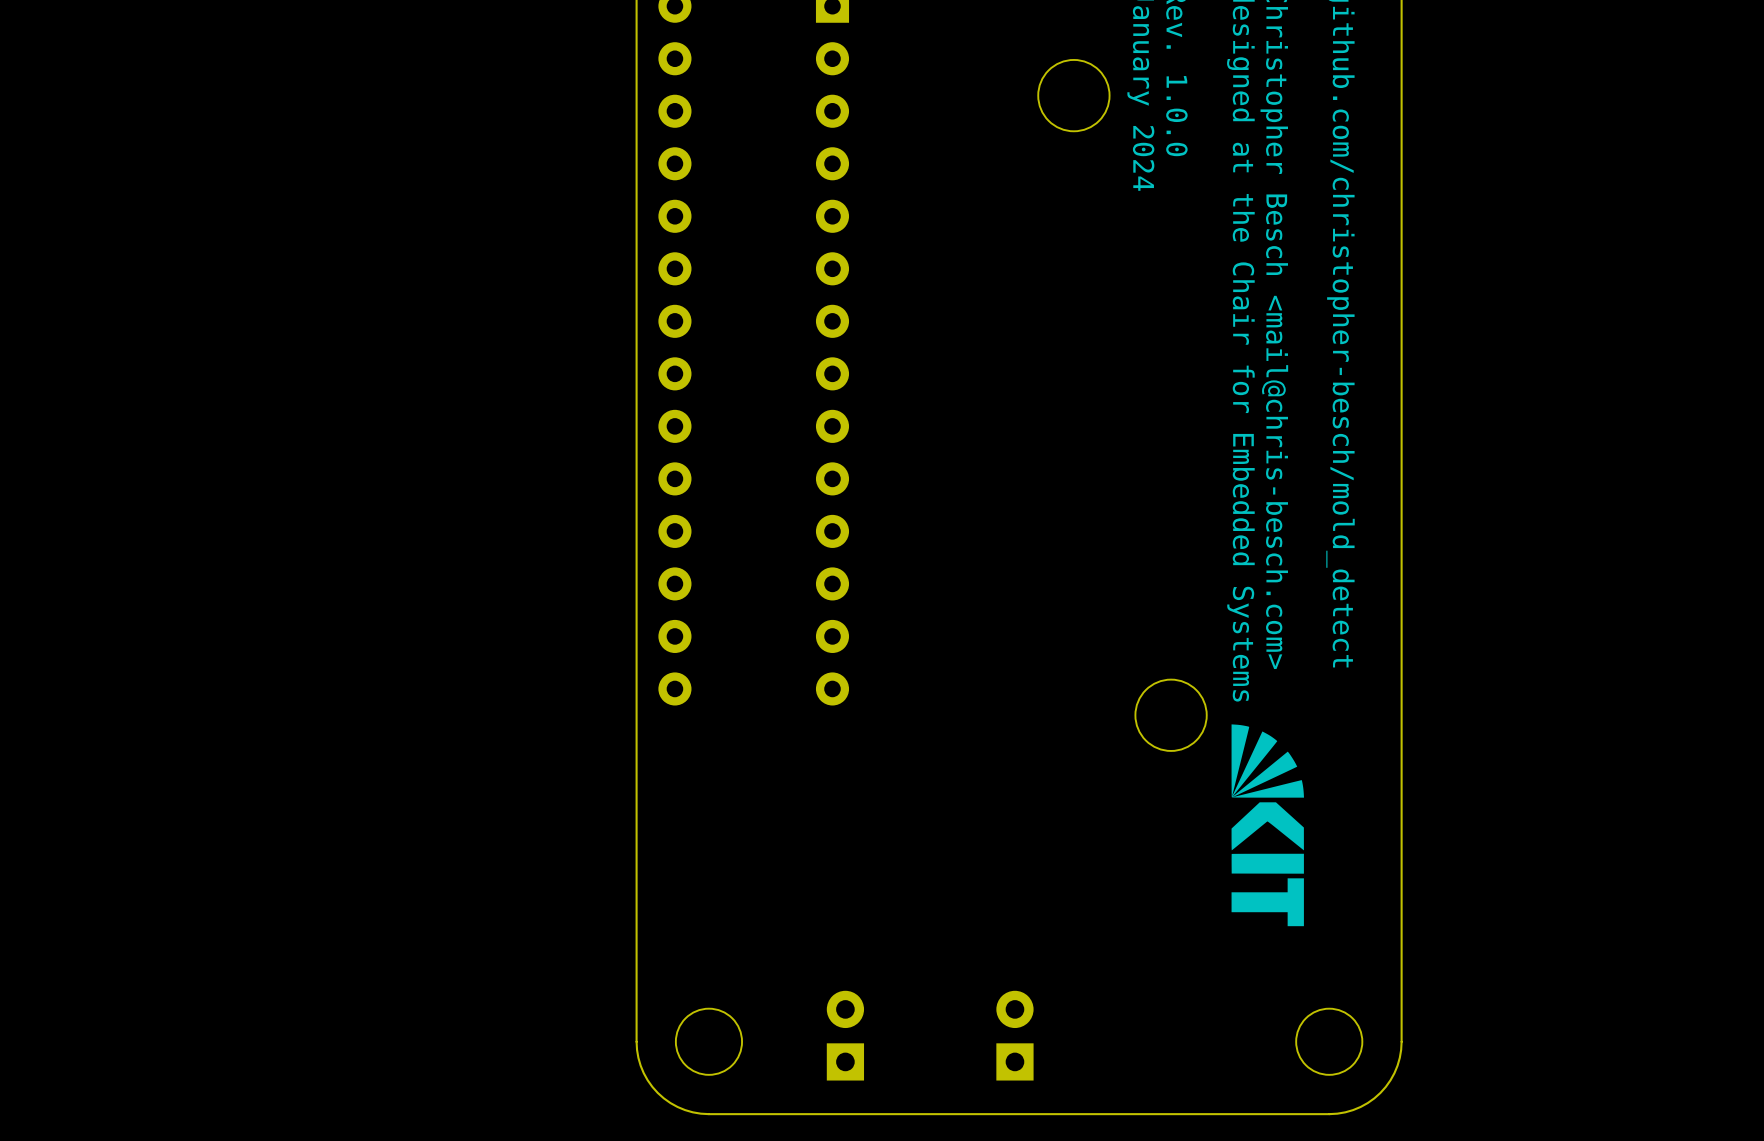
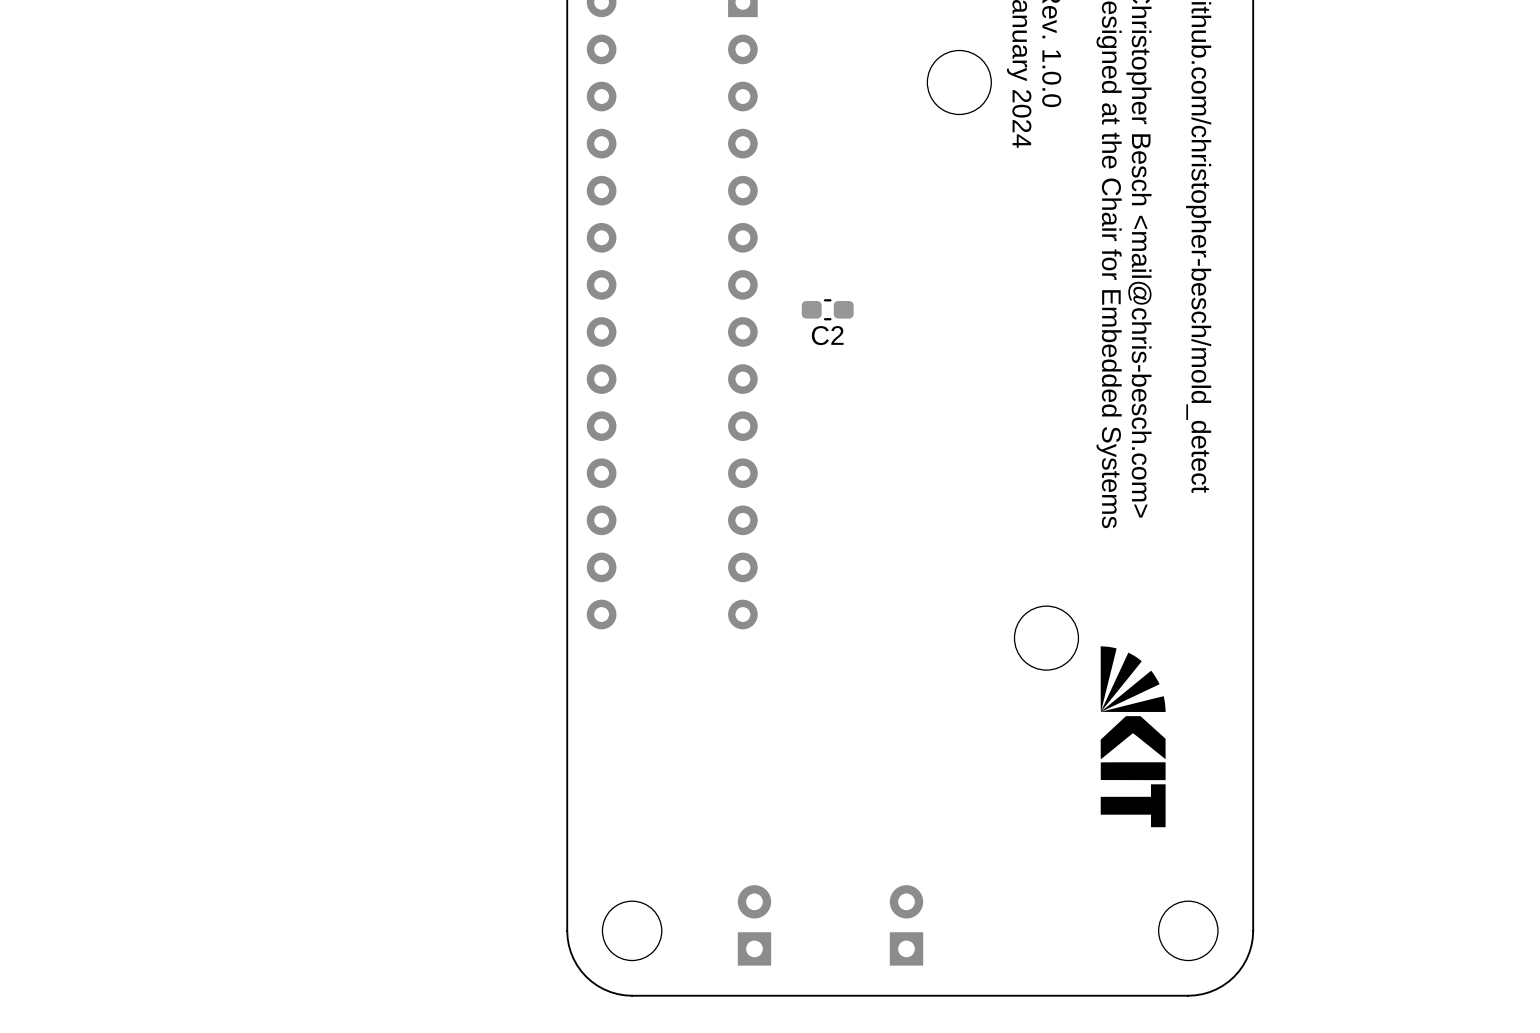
C2: none -> (827, 309)

